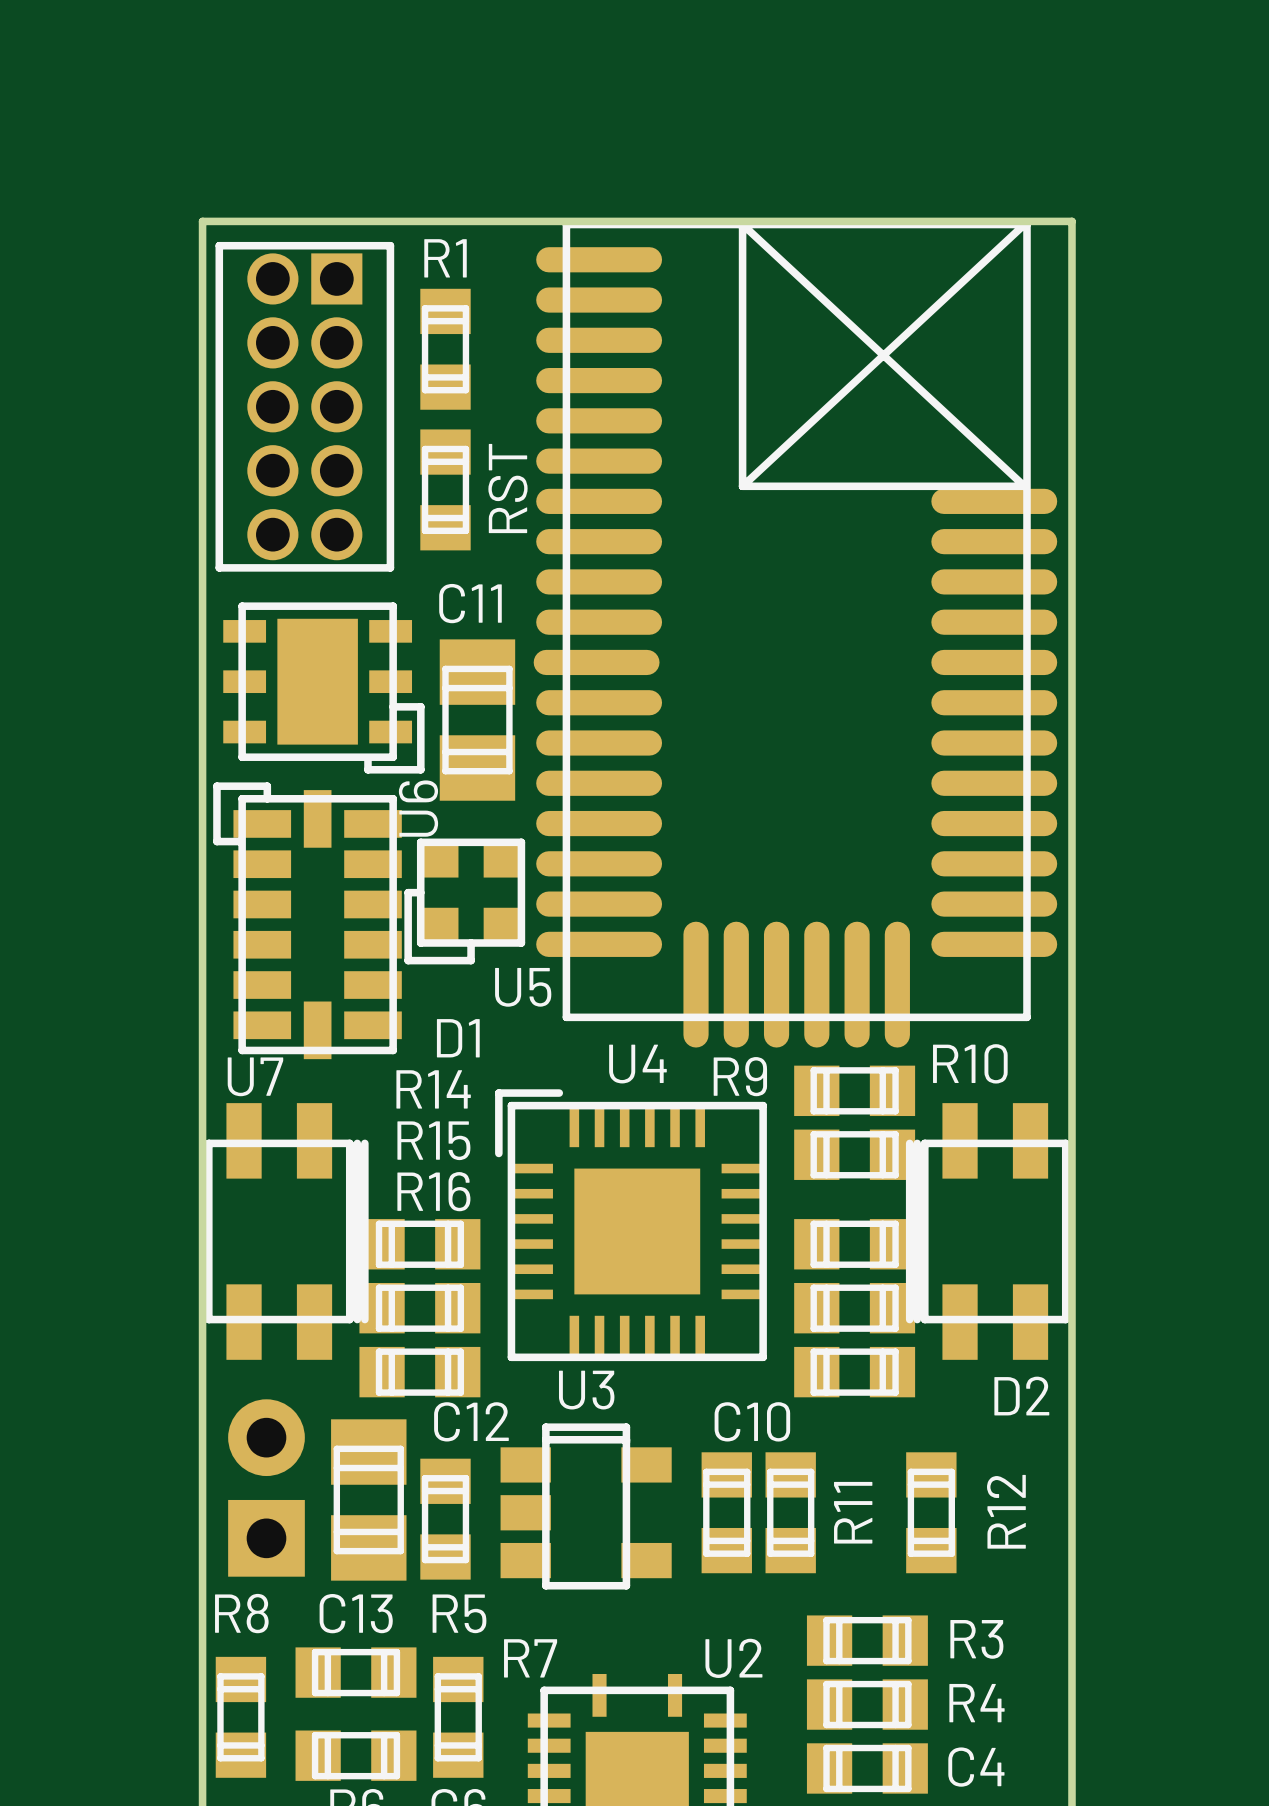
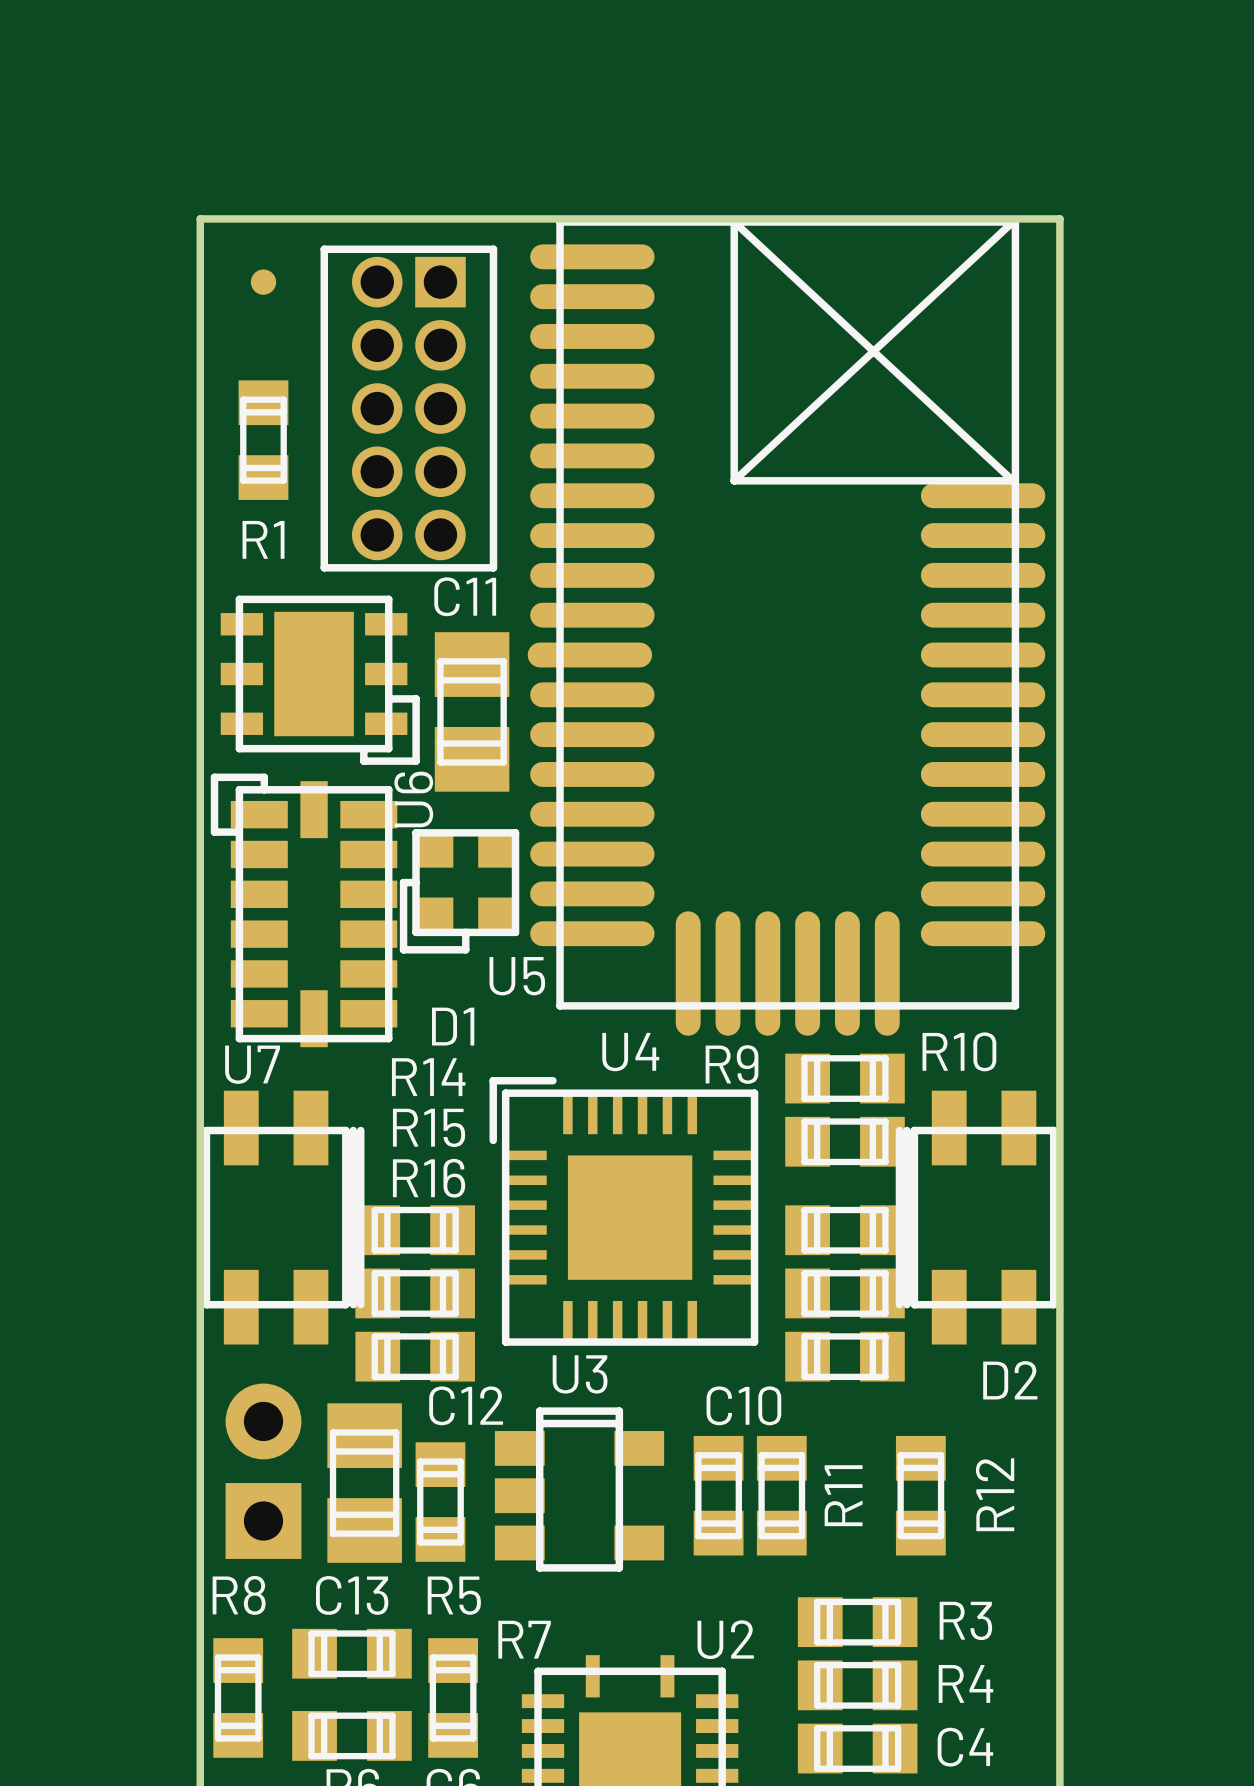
R1 name position: R1 (445, 258) -> R1 (263, 539)
part: none -> (263, 282)
R1 position: (445, 349) -> (263, 440)
part position: (304, 406) -> (408, 408)
text: RST (507, 488) -> none
part: (445, 489) -> none

